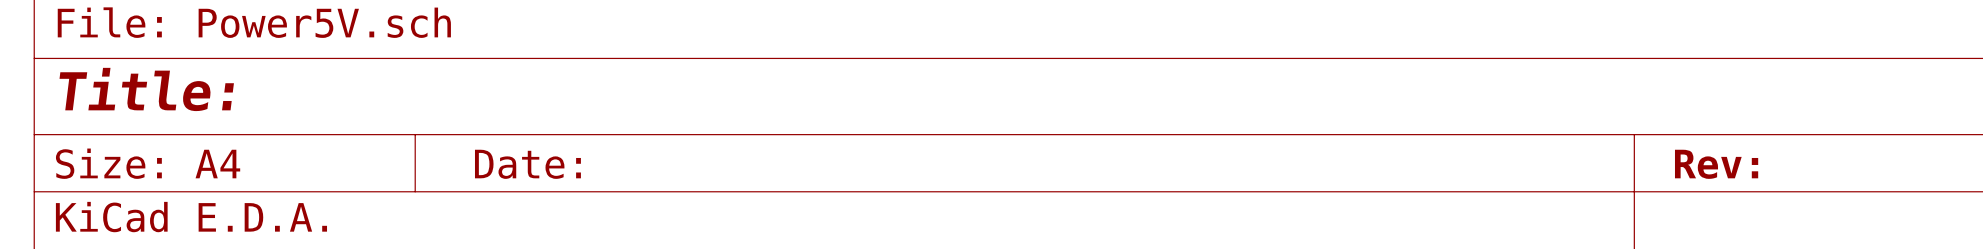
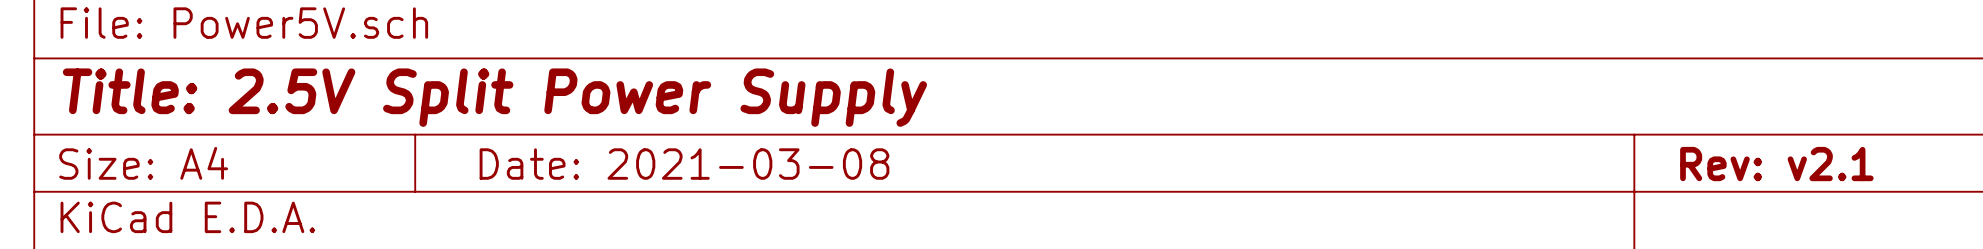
title block: Title: (146, 89) -> Title: 2.5V Split Power Supply (494, 97)
title block: Date: (527, 164) -> Date: 2021-03-08 (684, 164)
title block: Rev: (1716, 164) -> Rev: v2.1 (1776, 164)

